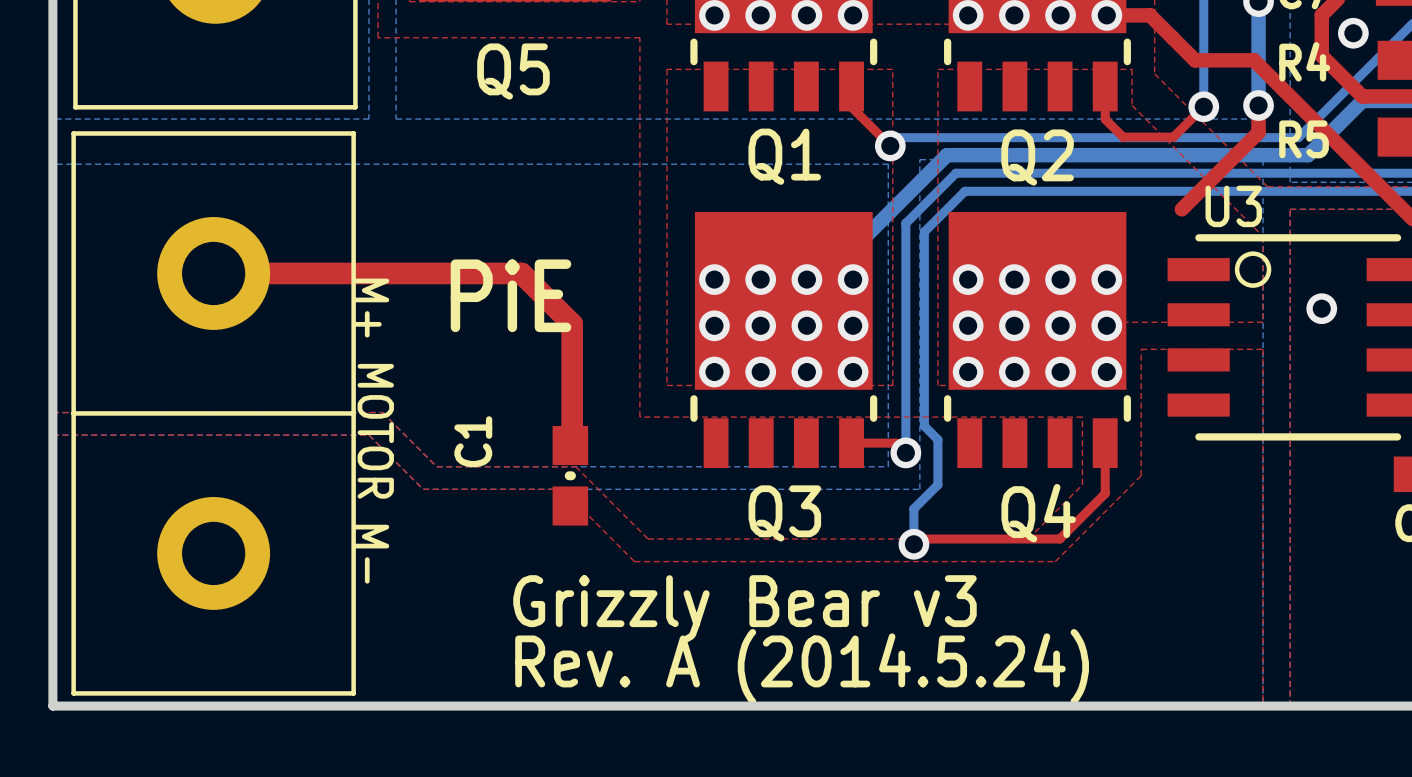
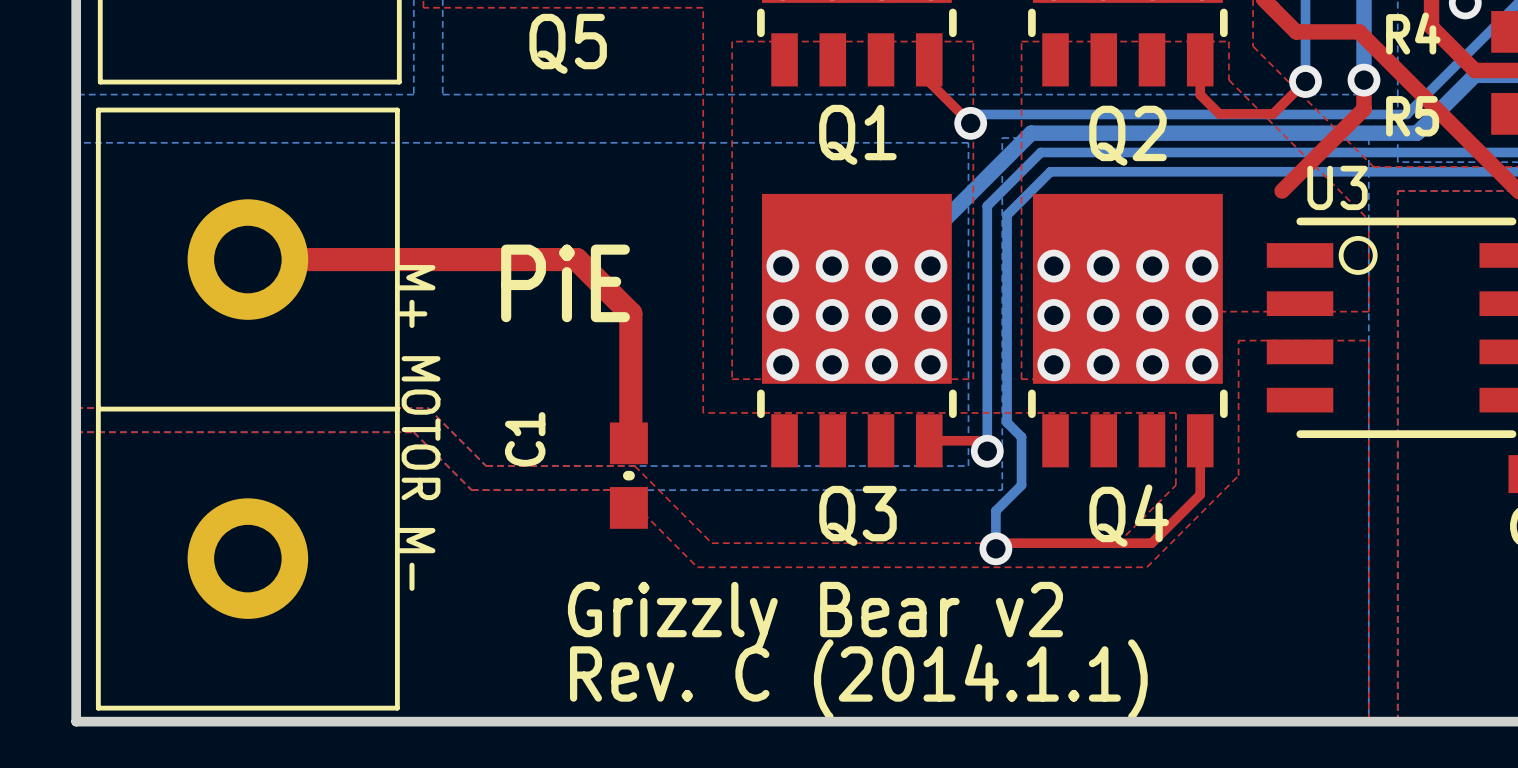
via: (1321, 308) -> none
text: Grizzly Bear v3 (744, 608) -> Grizzly Bear v2 (815, 617)
text: Rev. A (2014.5.24) (802, 666) -> Rev. C (2014.1.1) (858, 679)

